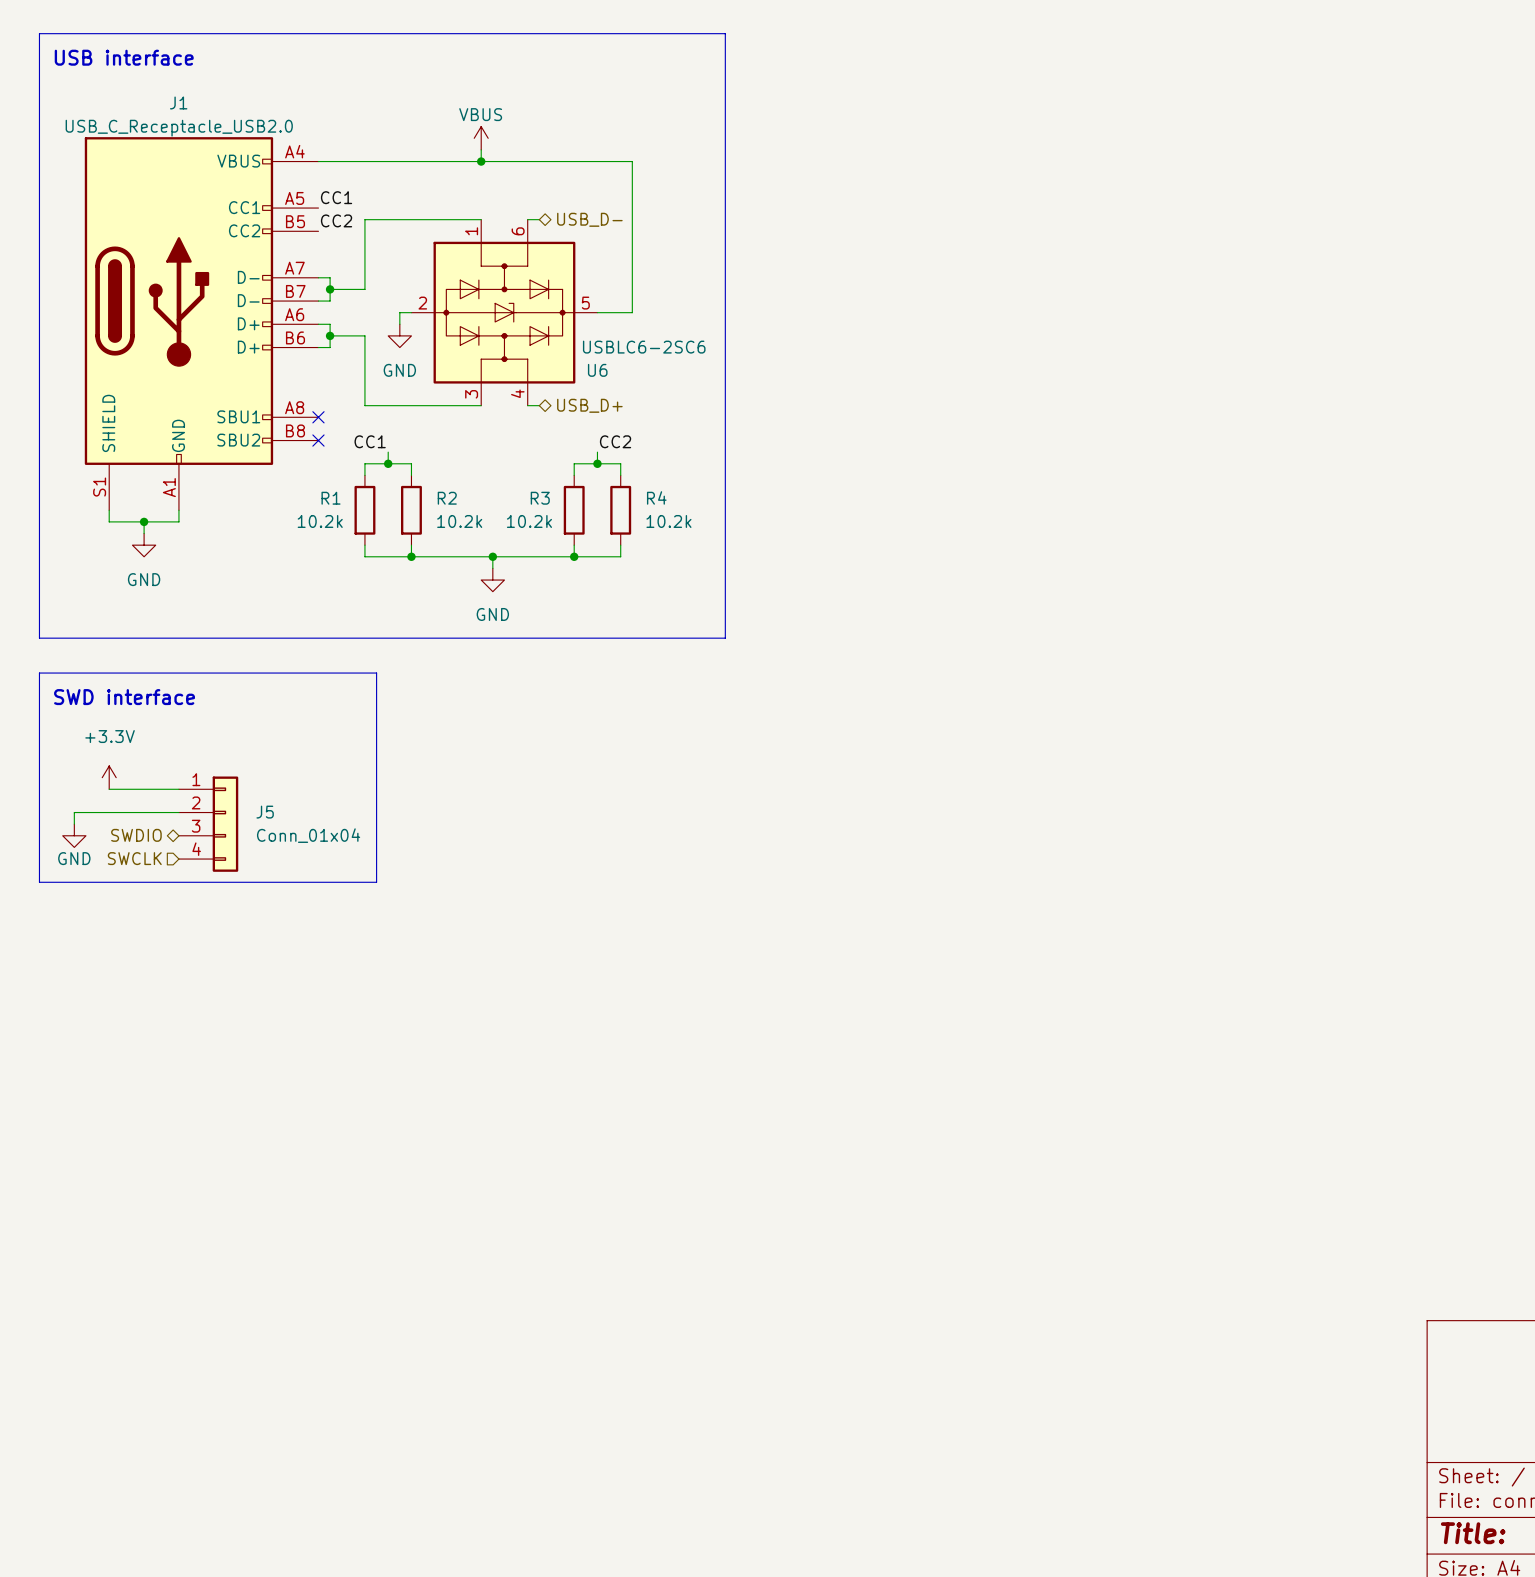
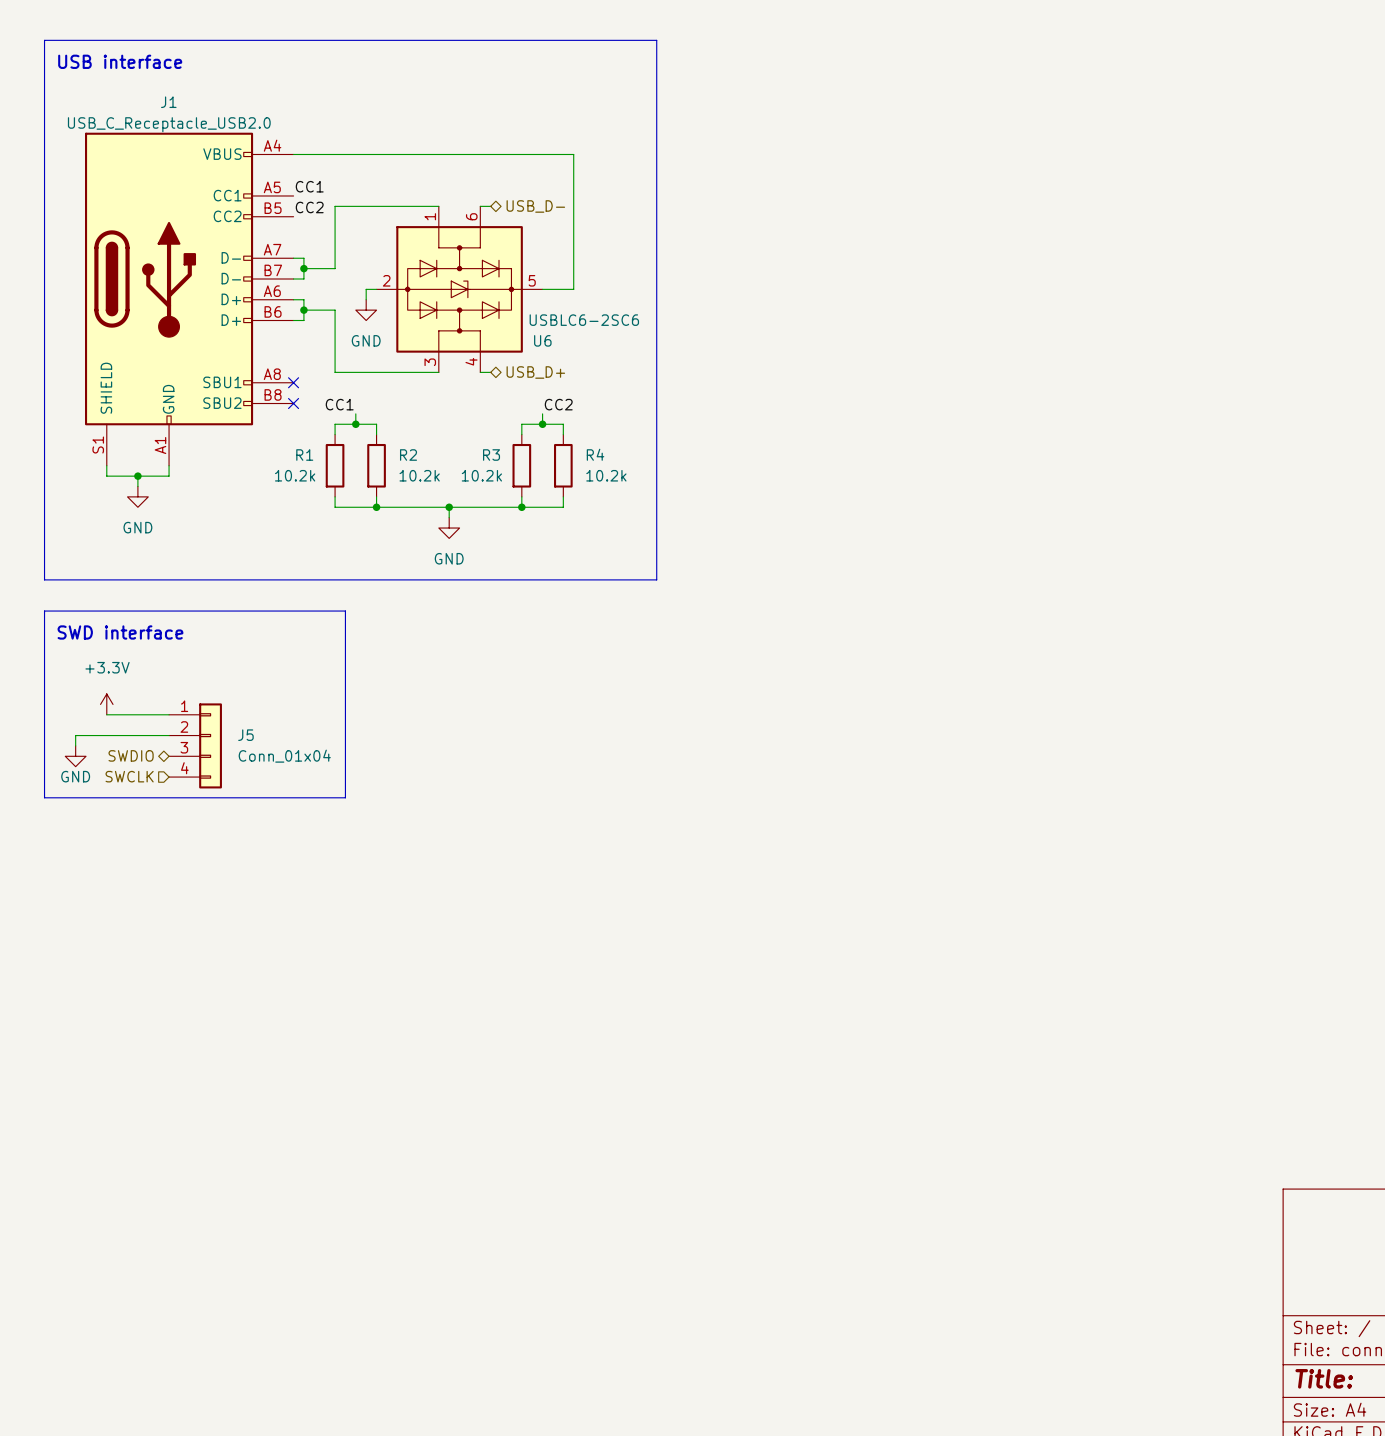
power symbol: VBUS (481, 138) -> none
wire: (481, 149) (481, 161) -> none
junction: (481, 161) -> none

